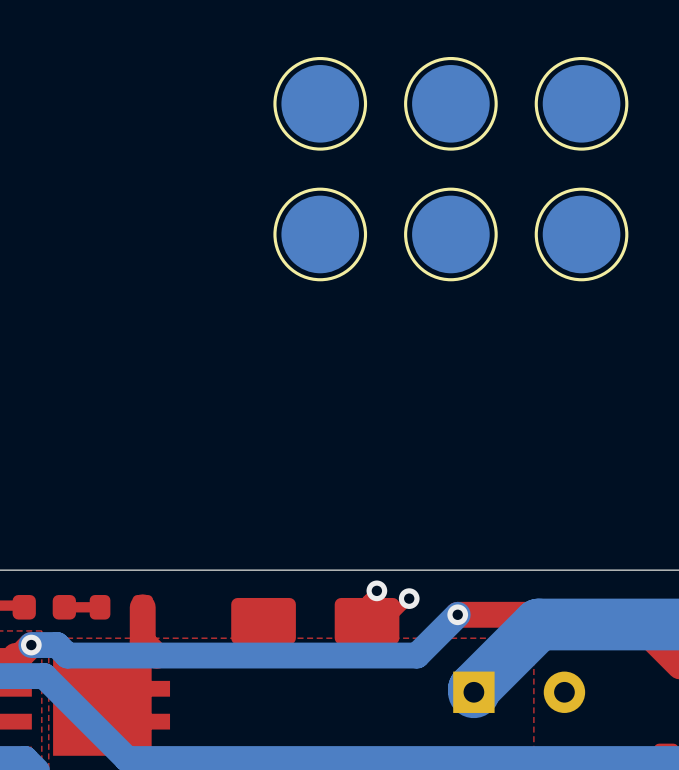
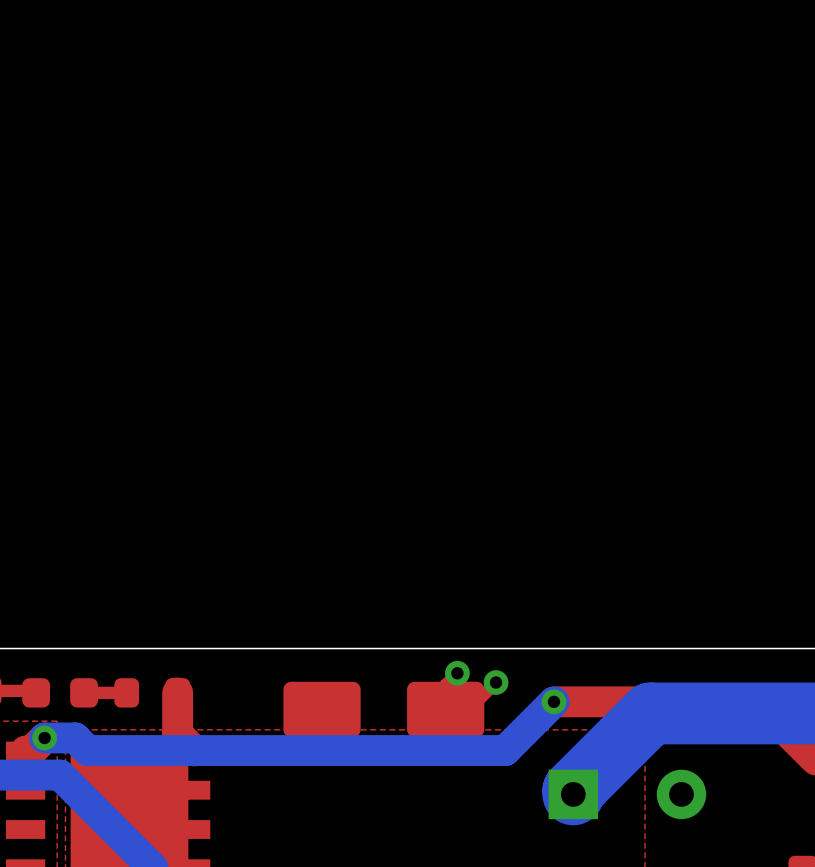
part: (320, 103) -> none
part: (450, 103) -> none
part: (581, 103) -> none
part: (320, 234) -> none
part: (450, 234) -> none
part: (581, 234) -> none

